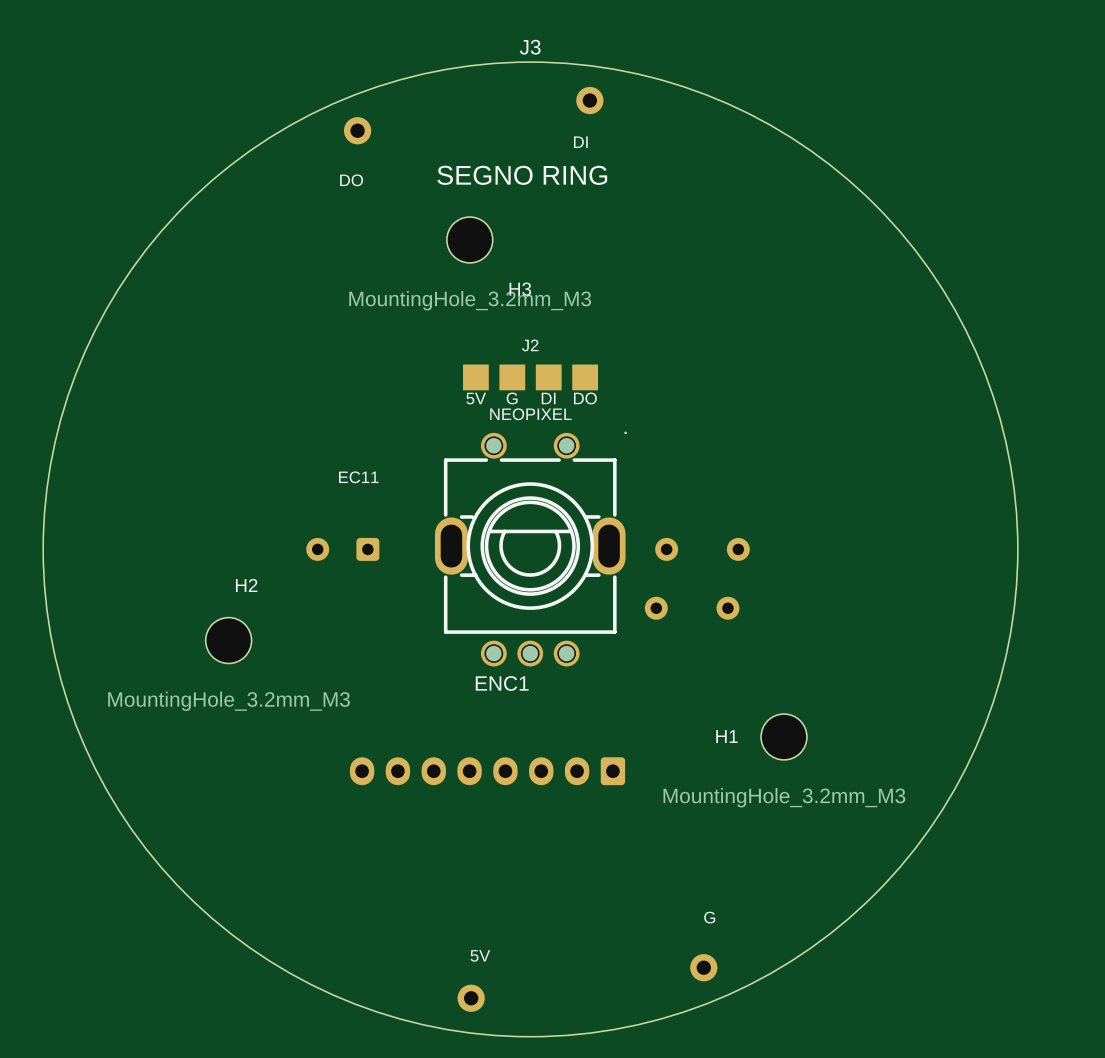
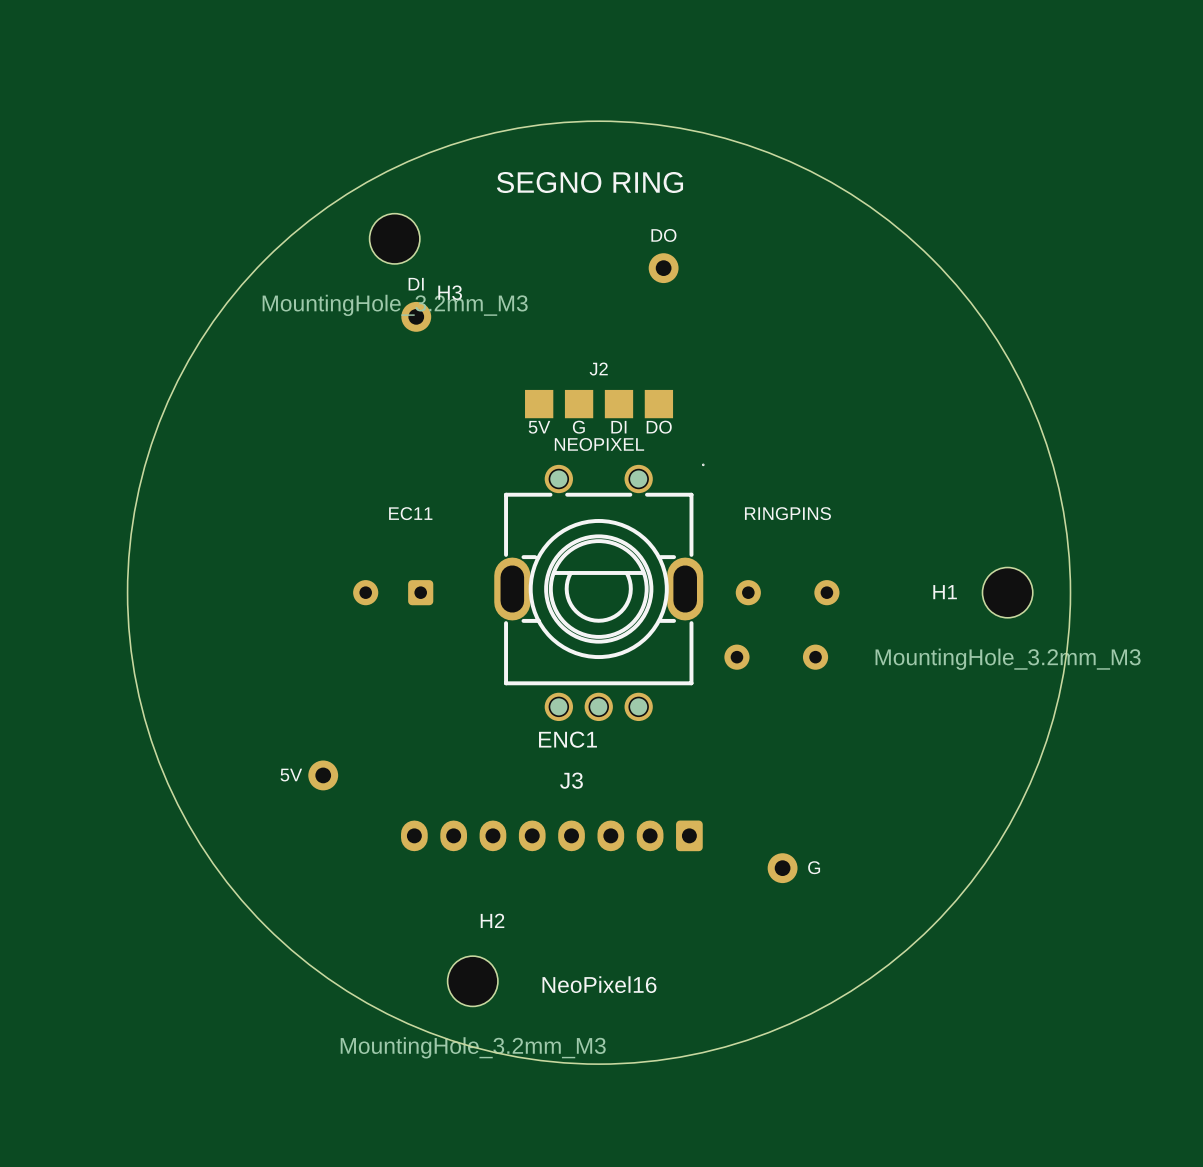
J3 name position: J3 (530, 47) -> J3 (571, 780)
round board edge size: [42, 61, 1019, 1038] -> [126, 120, 1072, 1065]
J3 footprint: [343, 86, 718, 1012] -> [308, 253, 798, 884]
H3 position: (469, 239) -> (394, 238)
J3 value: none -> RINGPINS (787, 513)
H2 position: (228, 640) -> (472, 981)
H1 position: (783, 736) -> (1007, 592)
drawing: none -> [542, 976, 657, 994]

